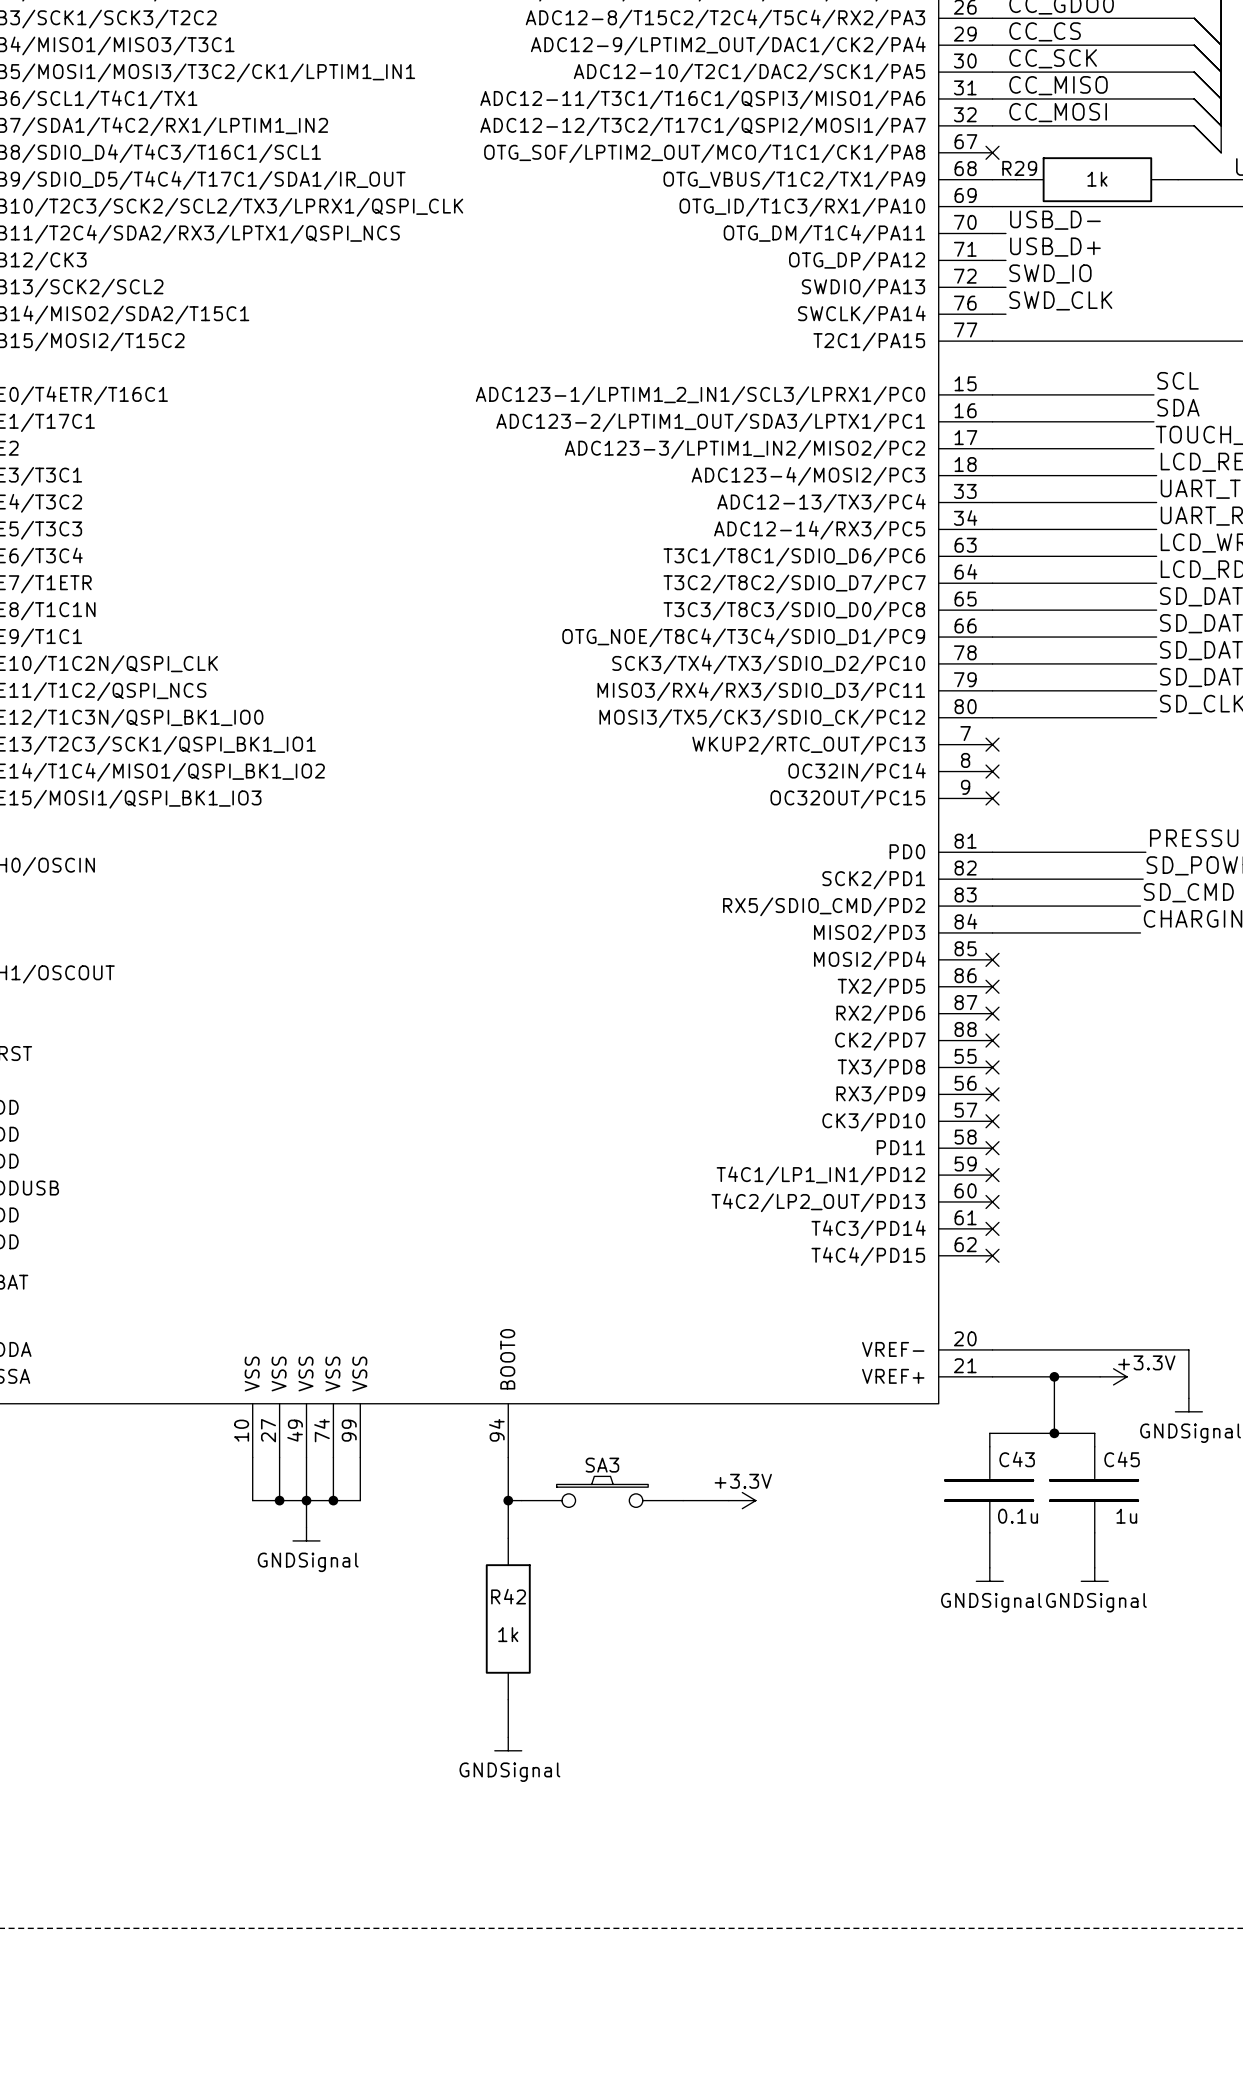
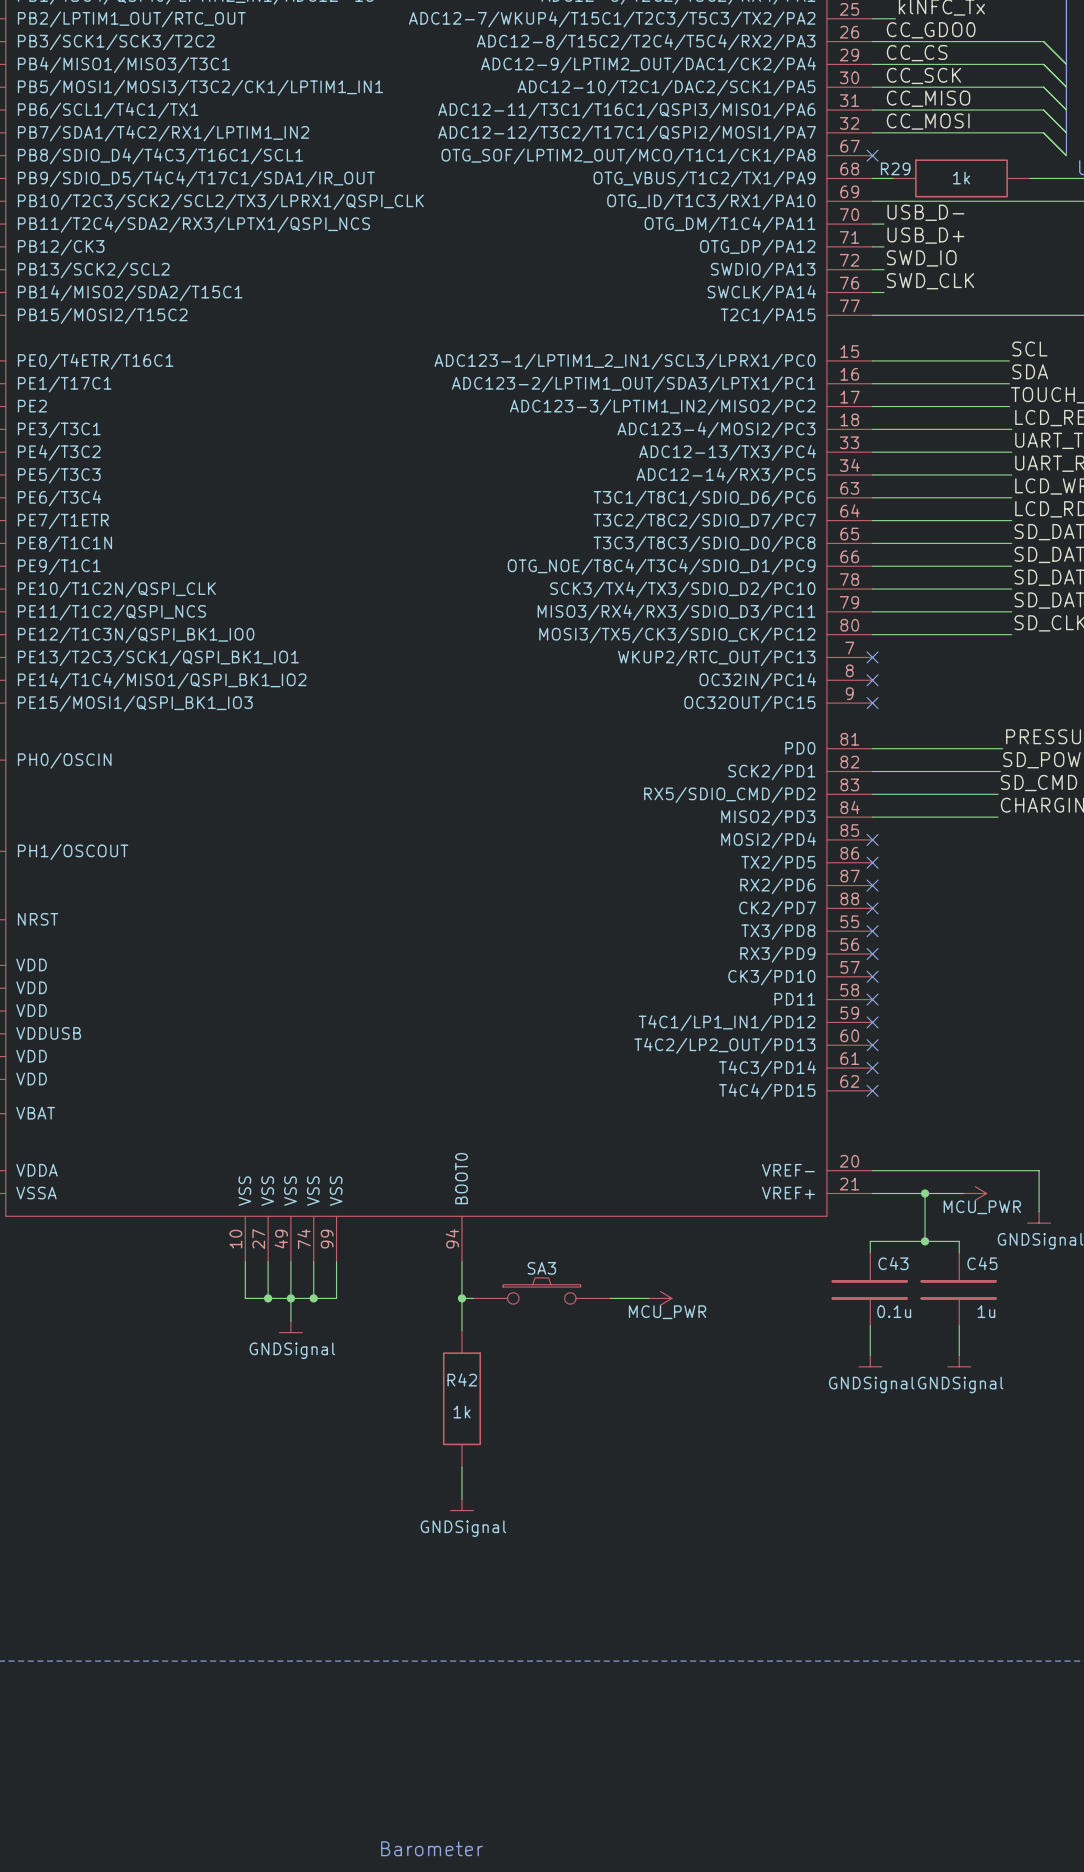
power symbol: +3.3V (1113, 1376) -> MCU_PWR (975, 1193)
power symbol: +3.3V (742, 1500) -> MCU_PWR (660, 1298)

